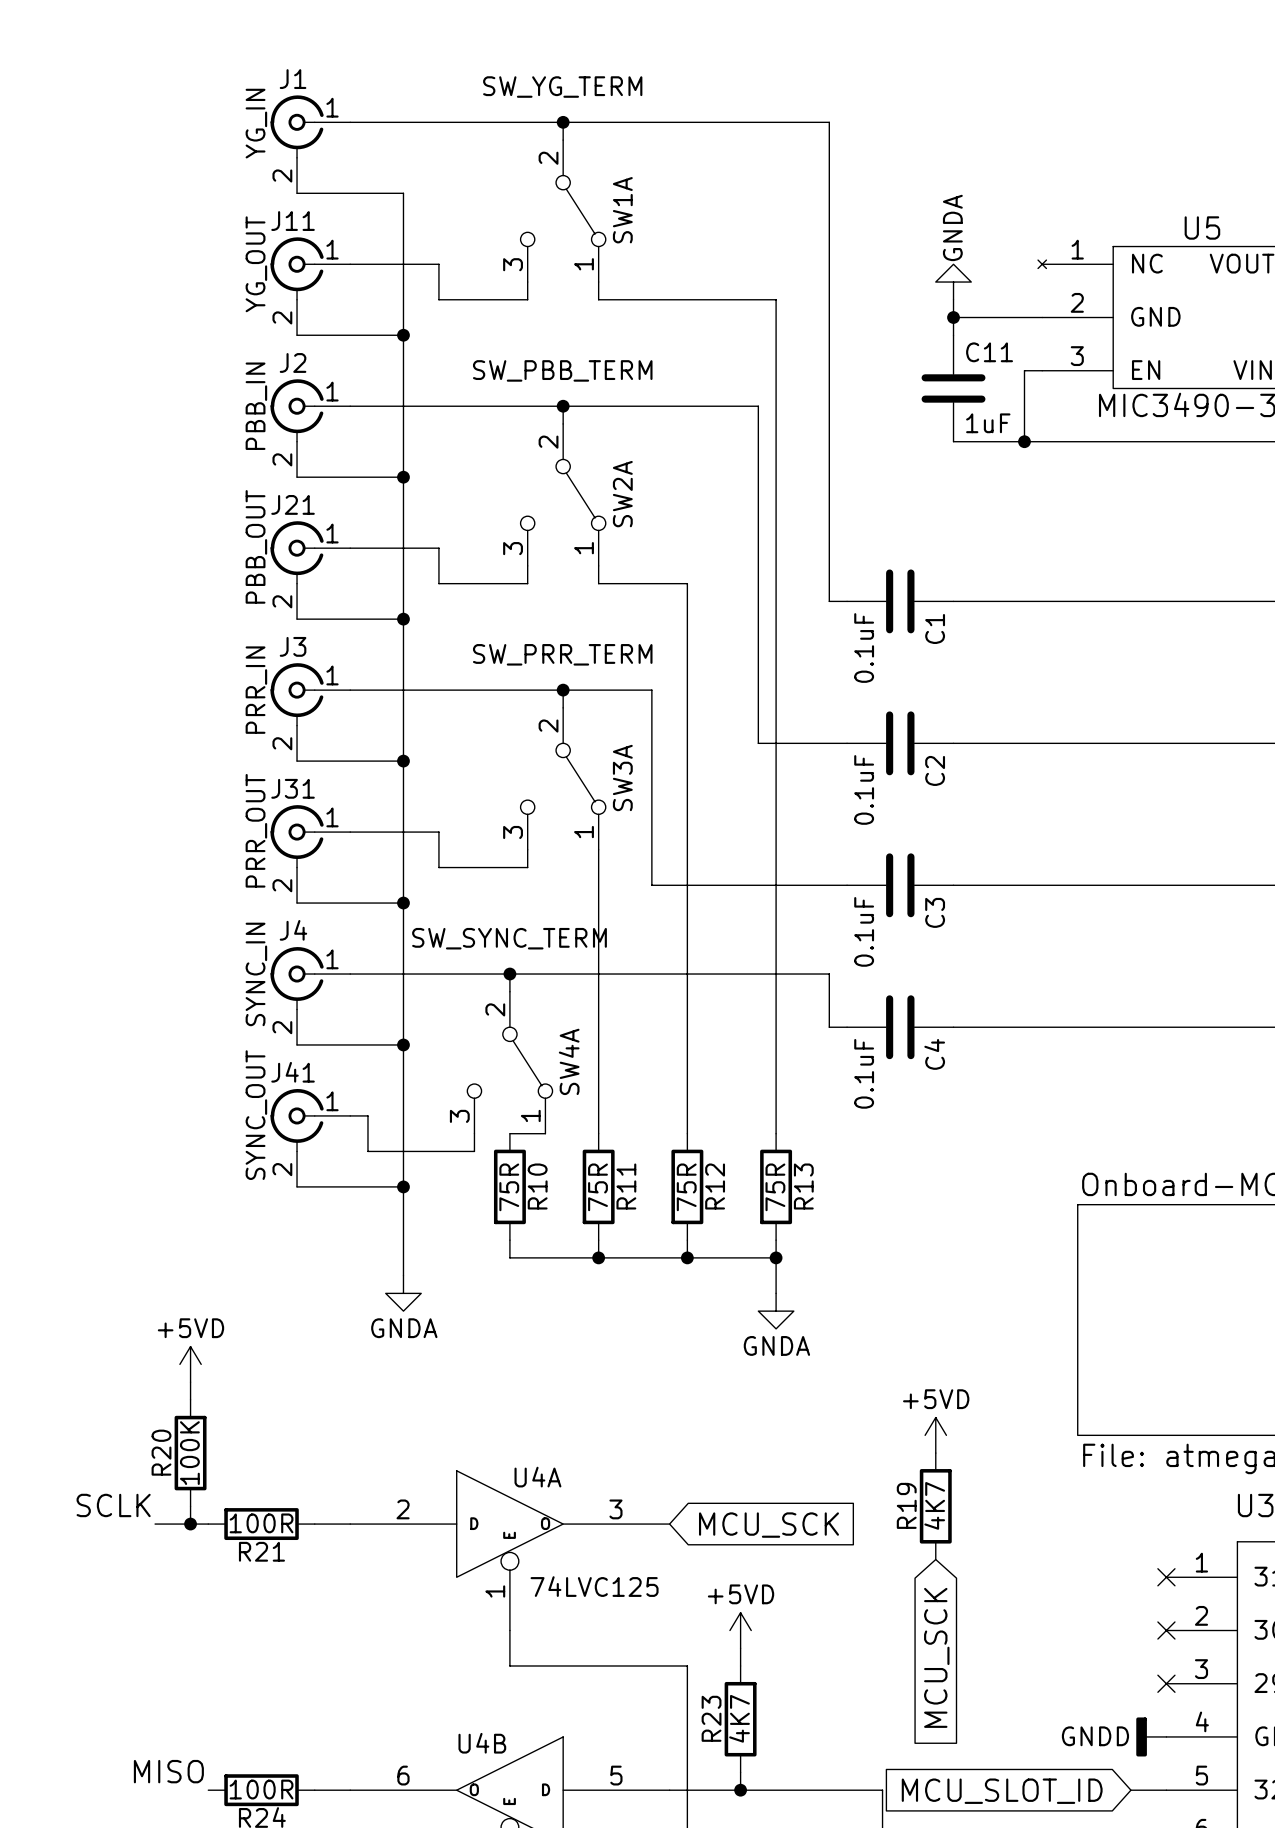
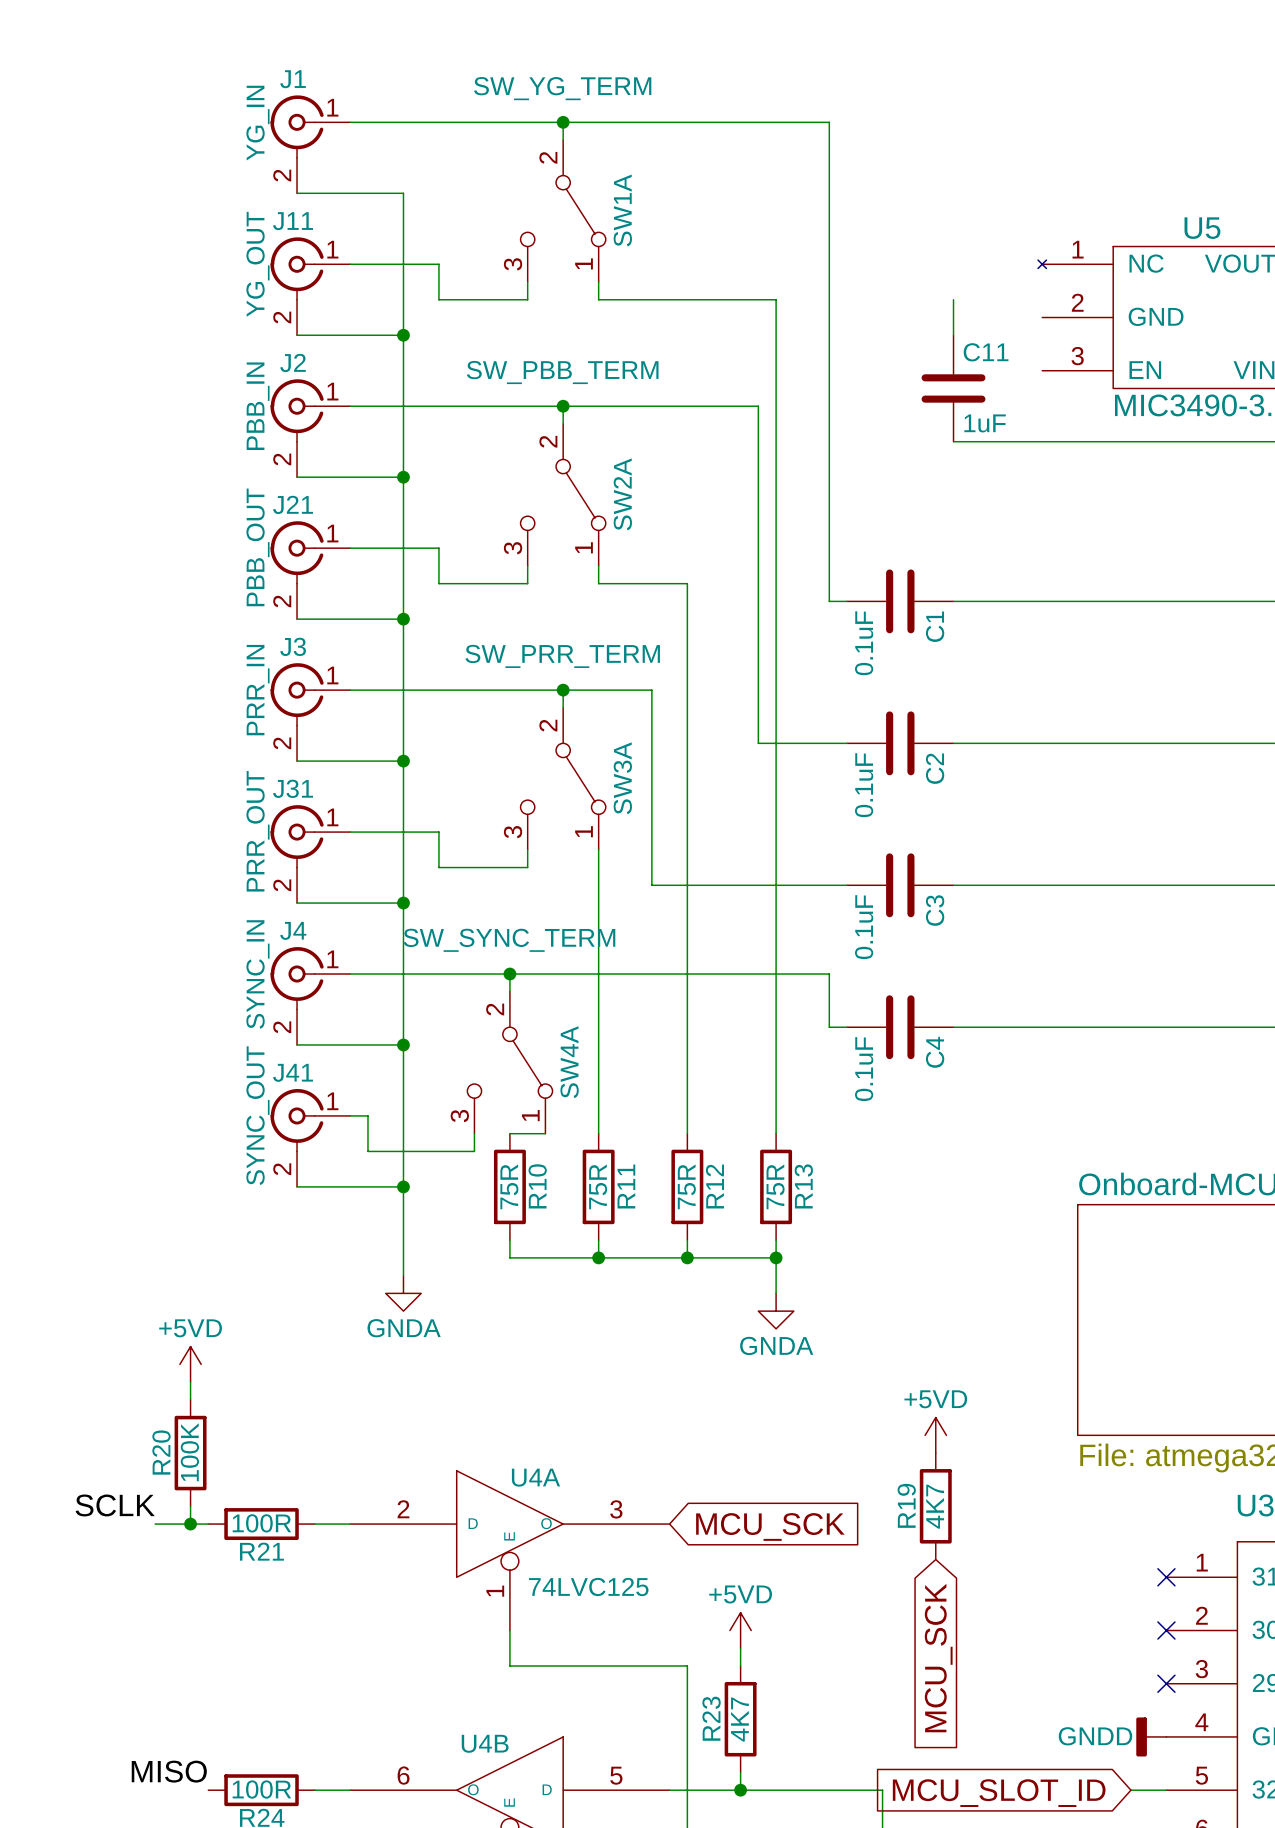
power symbol: GNDA (953, 282) -> none
wire: (953, 317) (1042, 317) -> none
junction: (953, 317) -> none
wire: (1042, 370) (1024, 370) (1024, 441) -> none
junction: (1024, 441) -> none

